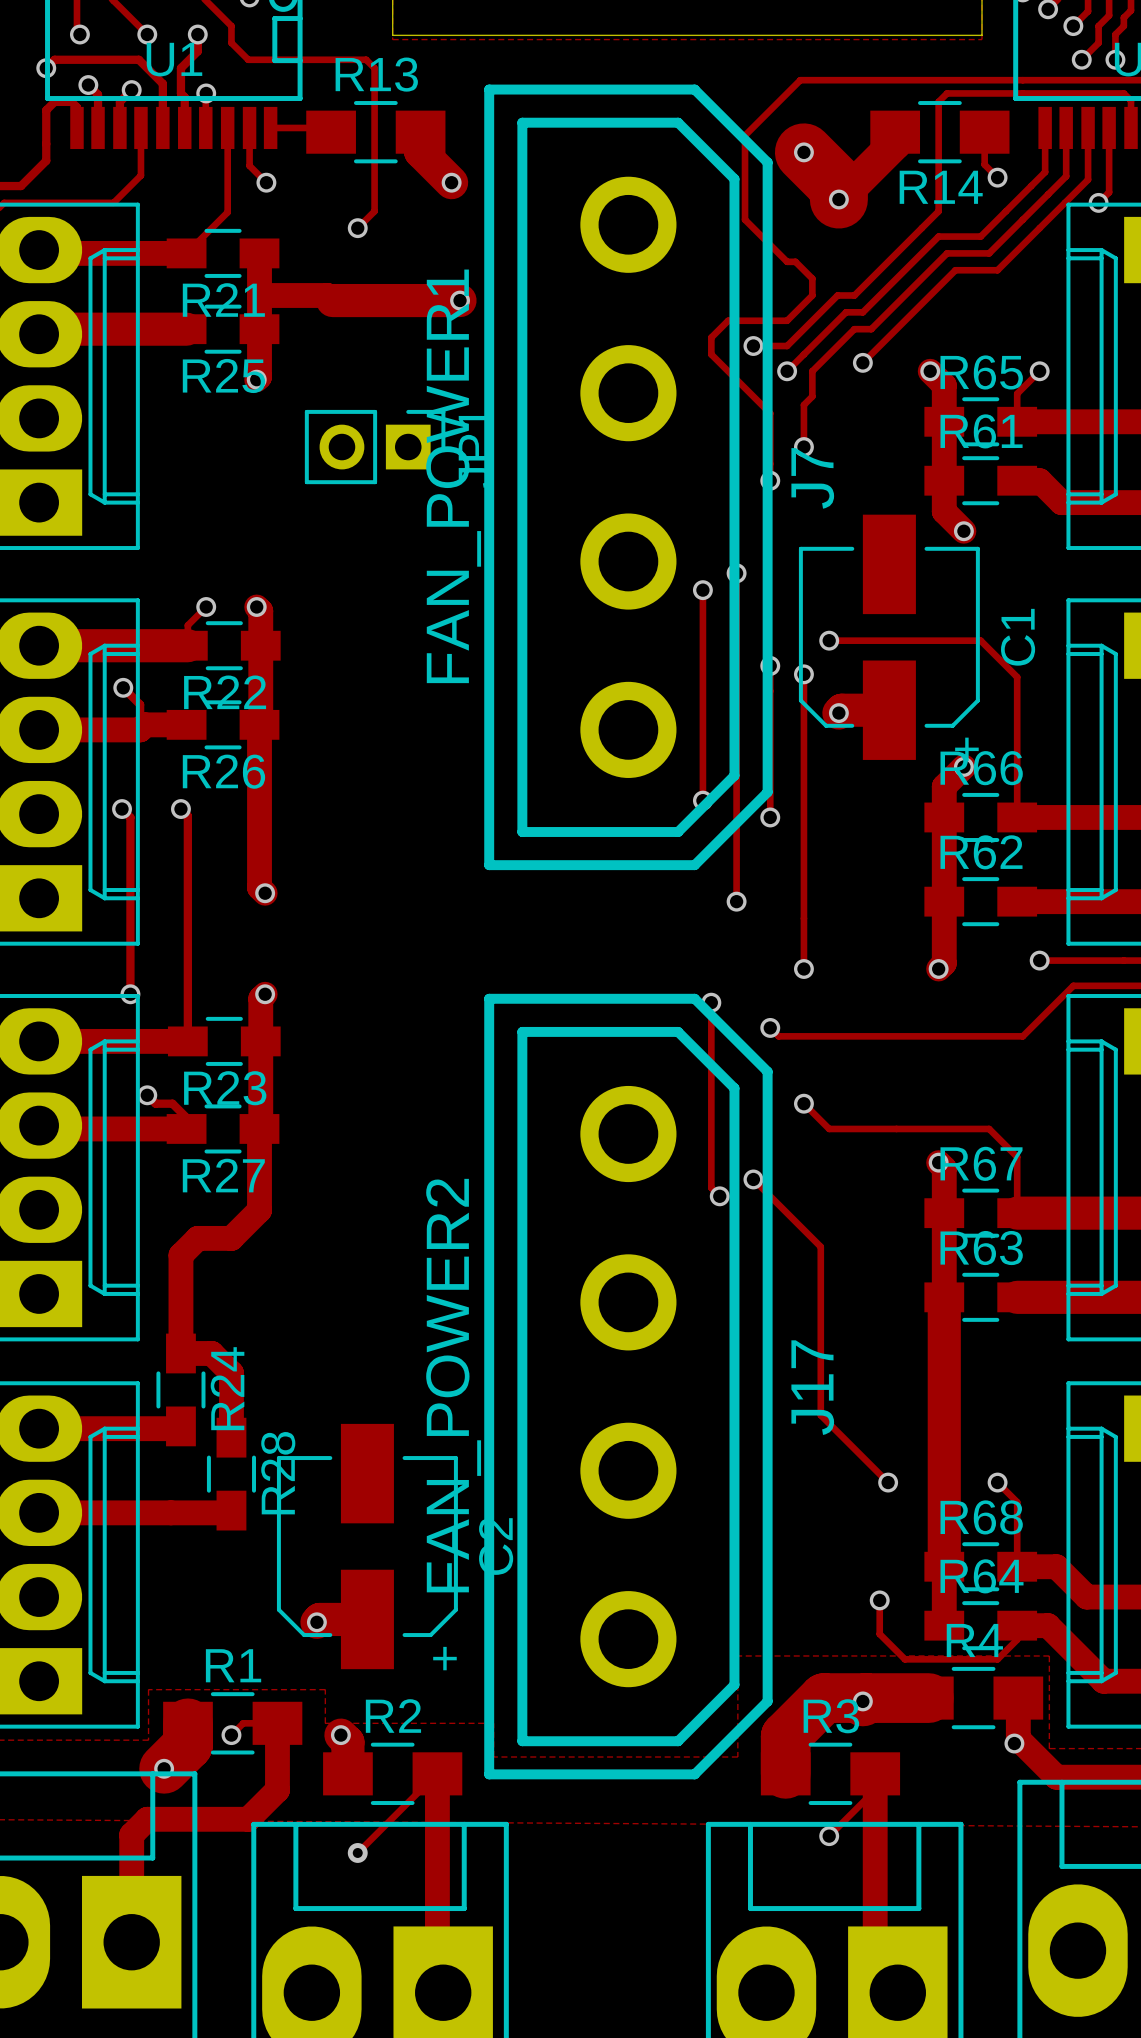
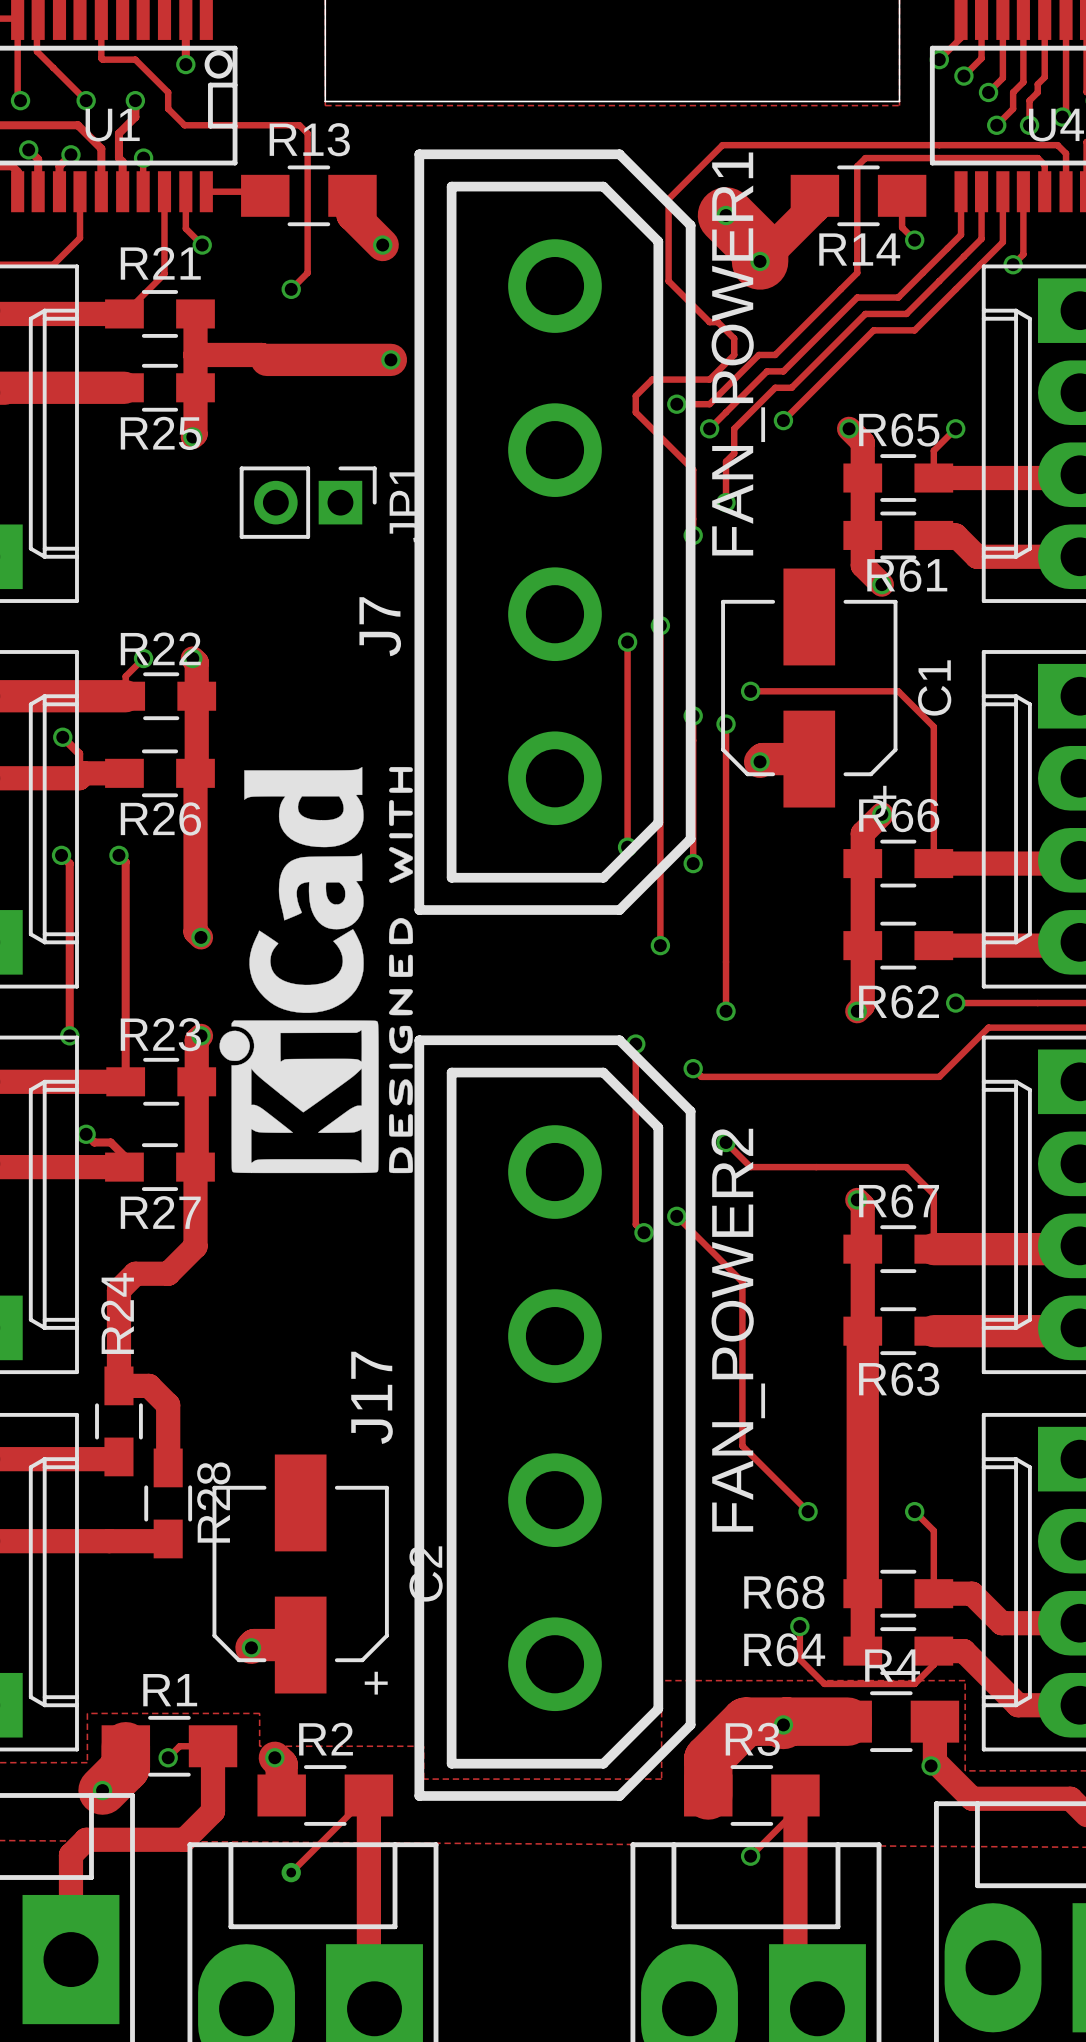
R21 name position: R21 (223, 299) -> R21 (160, 263)
R61 name position: R61 (981, 431) -> R61 (907, 575)
J7 value position: FAN_POWER1 (453, 476) -> FAN_POWER1 (738, 353)
J7 name position: J7 (812, 478) -> J7 (380, 626)
R22 name position: R22 (225, 692) -> R22 (160, 648)
drawing: none -> [219, 766, 413, 1174]
R62 name position: R62 (981, 852) -> R62 (899, 1001)
R23 name position: R23 (225, 1088) -> R23 (160, 1034)
R63 name position: R63 (981, 1248) -> R63 (899, 1379)
J17 value position: FAN_POWER2 (453, 1385) -> FAN_POWER2 (738, 1330)
J17 name position: J17 (812, 1387) -> J17 (372, 1397)
R24 name position: R24 (227, 1388) -> R24 (117, 1313)
R68 name position: R68 (981, 1517) -> R68 (784, 1592)
R64 name position: R64 (982, 1576) -> R64 (784, 1649)

